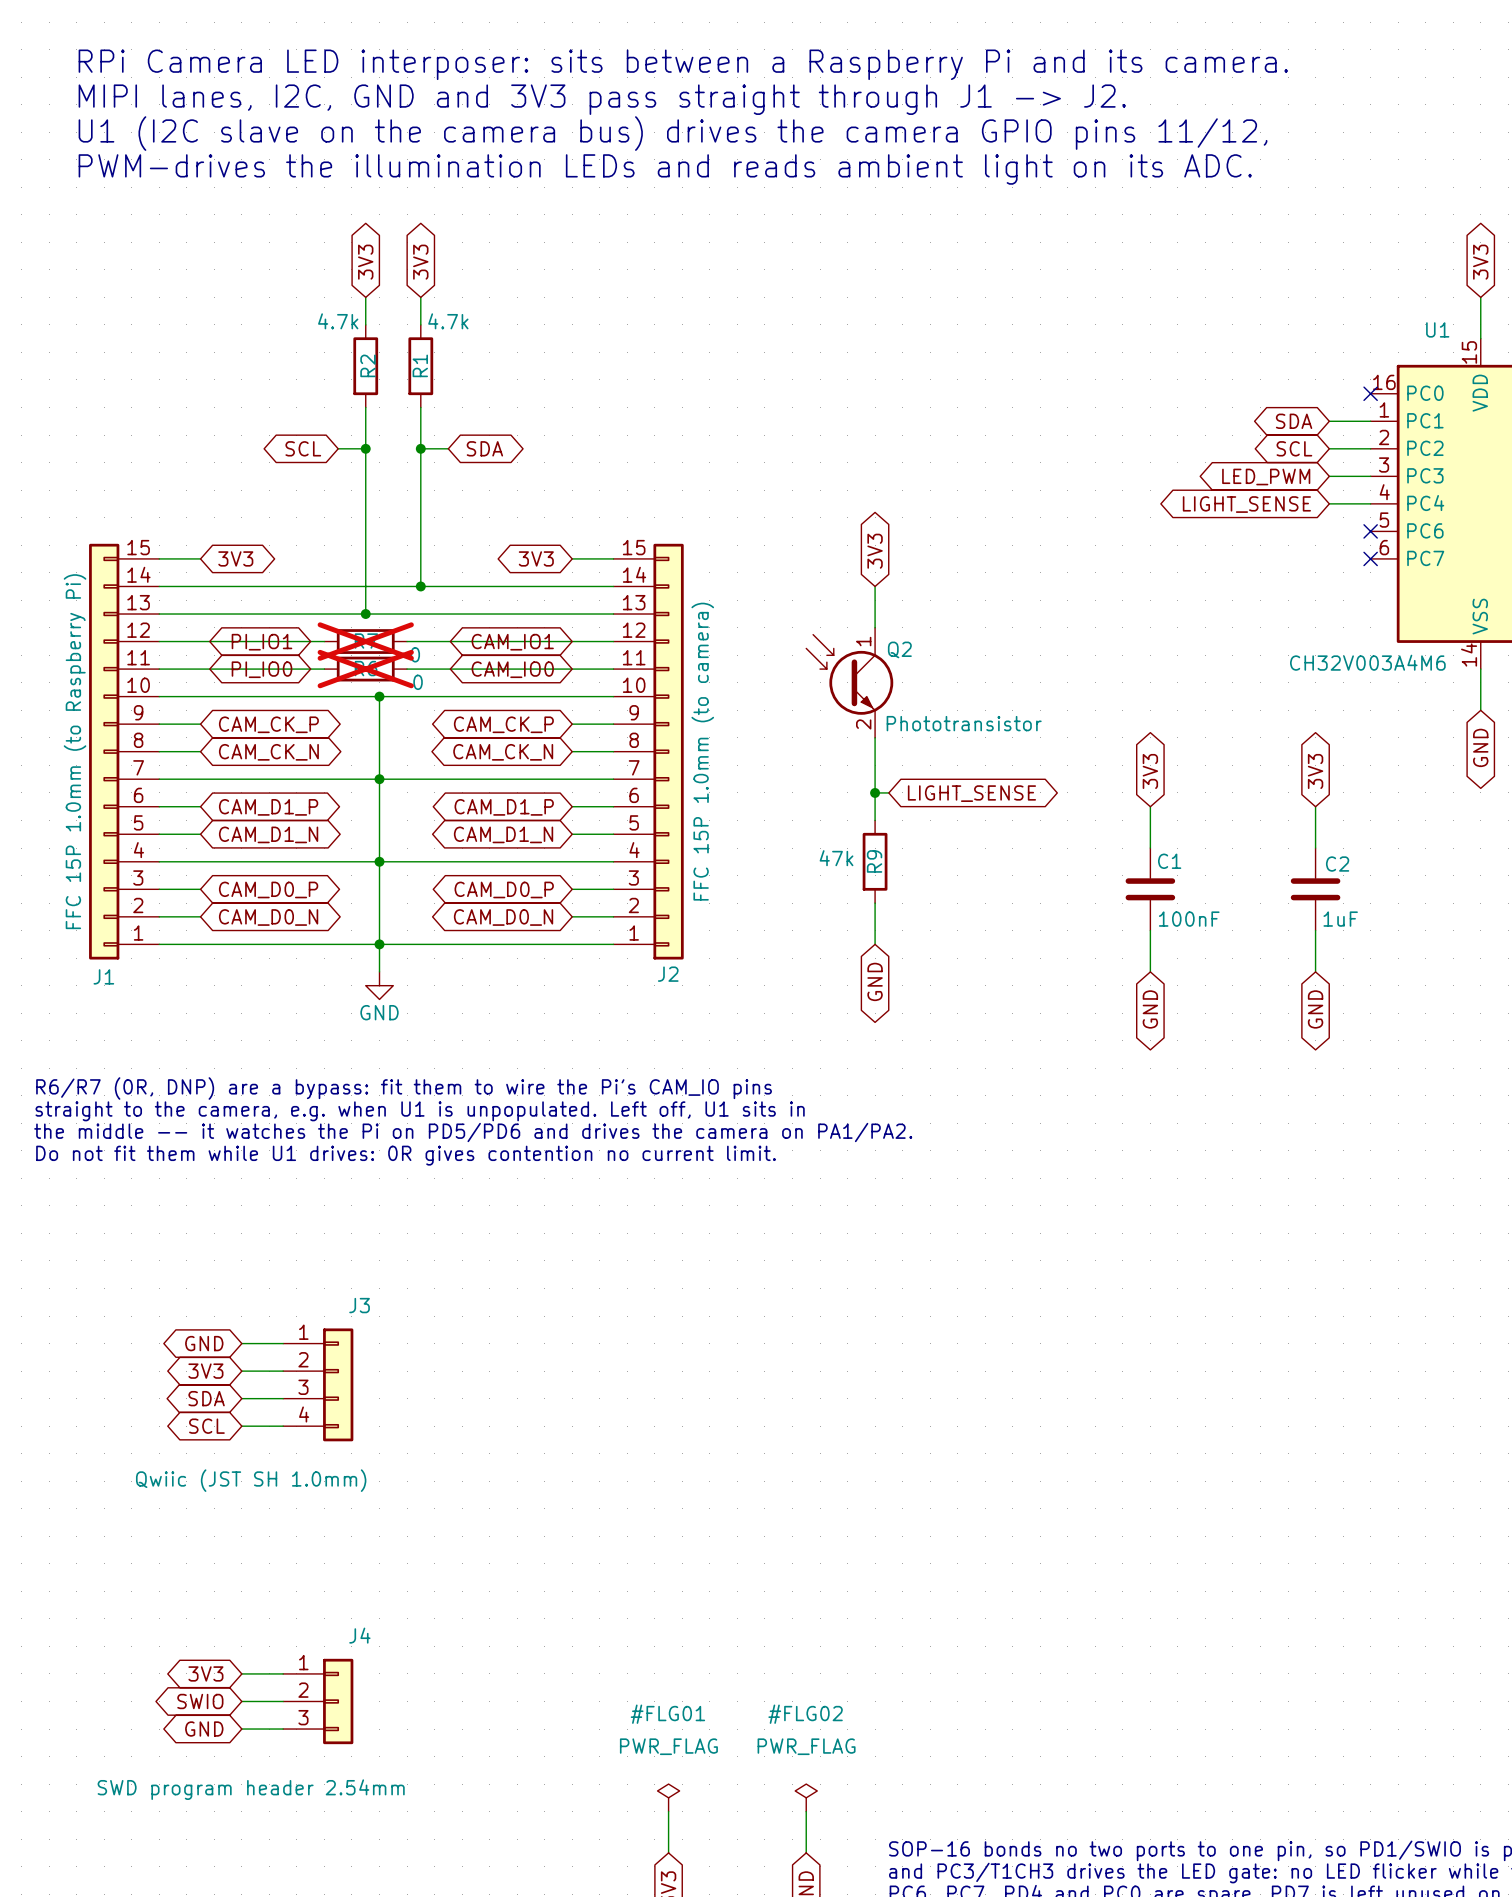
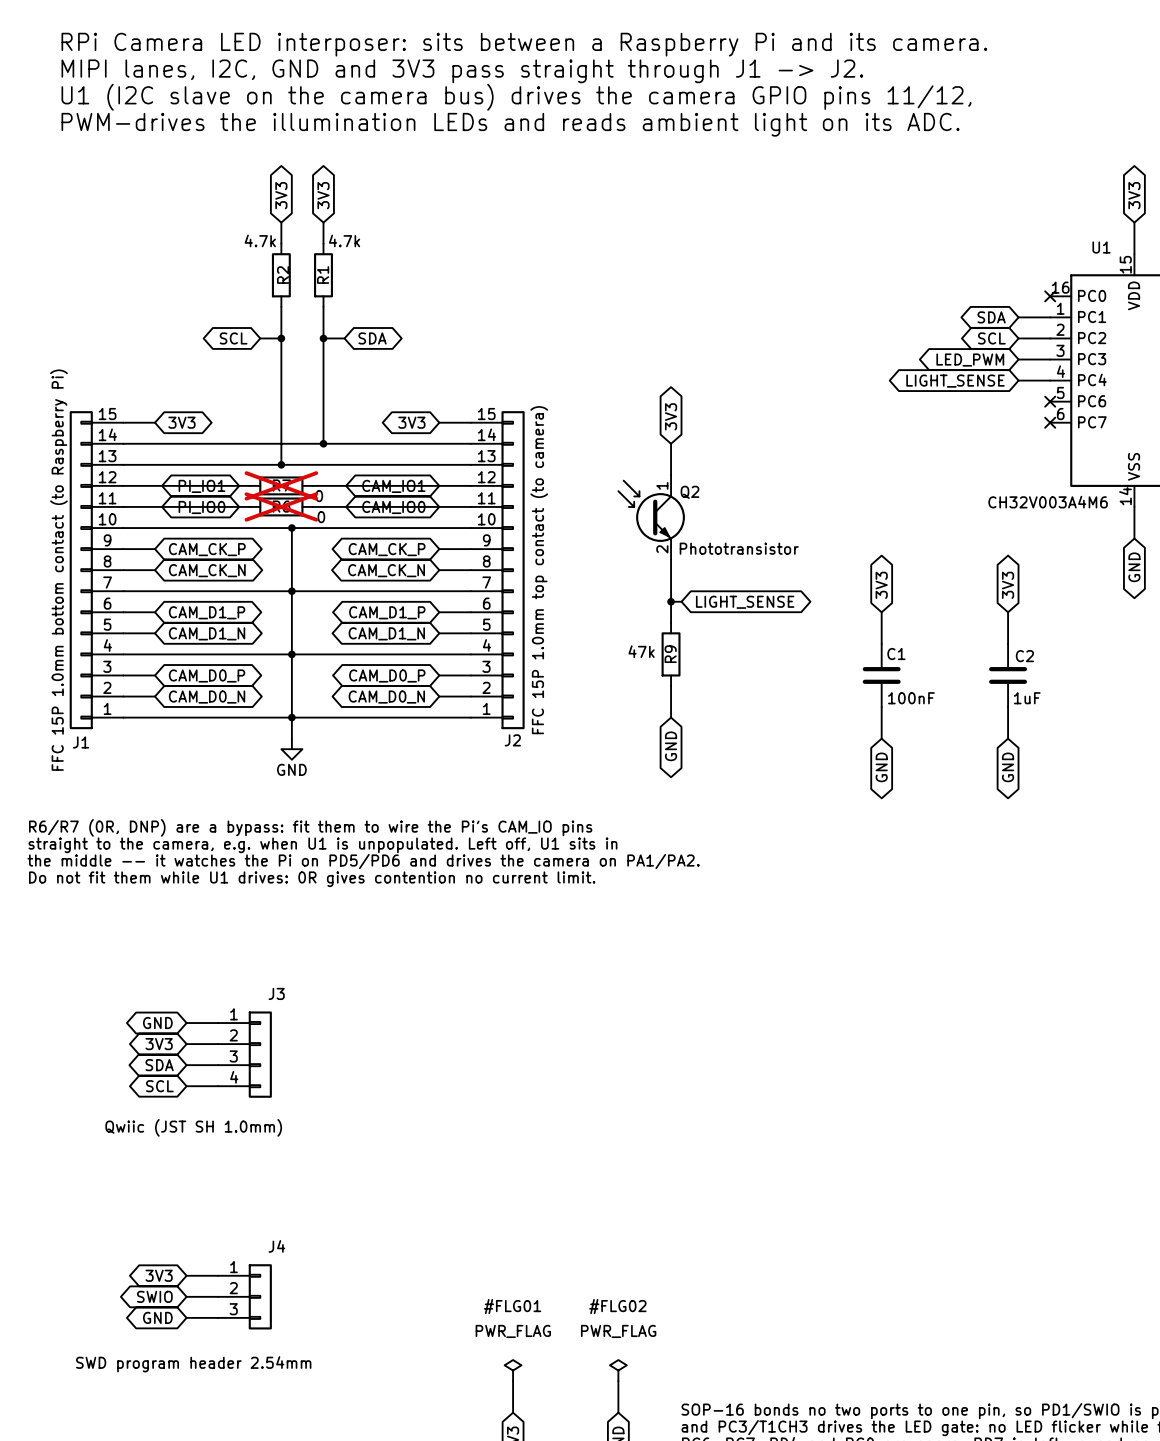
J1 value: FFC 15P 1.0mm (to Raspberry Pi) (75, 751) -> FFC 15P 1.0mm bottom contact (to Raspberry Pi) (58, 570)
J2 value: FFC 15P 1.0mm (to camera) (702, 751) -> FFC 15P 1.0mm top contact (to camera) (539, 570)

